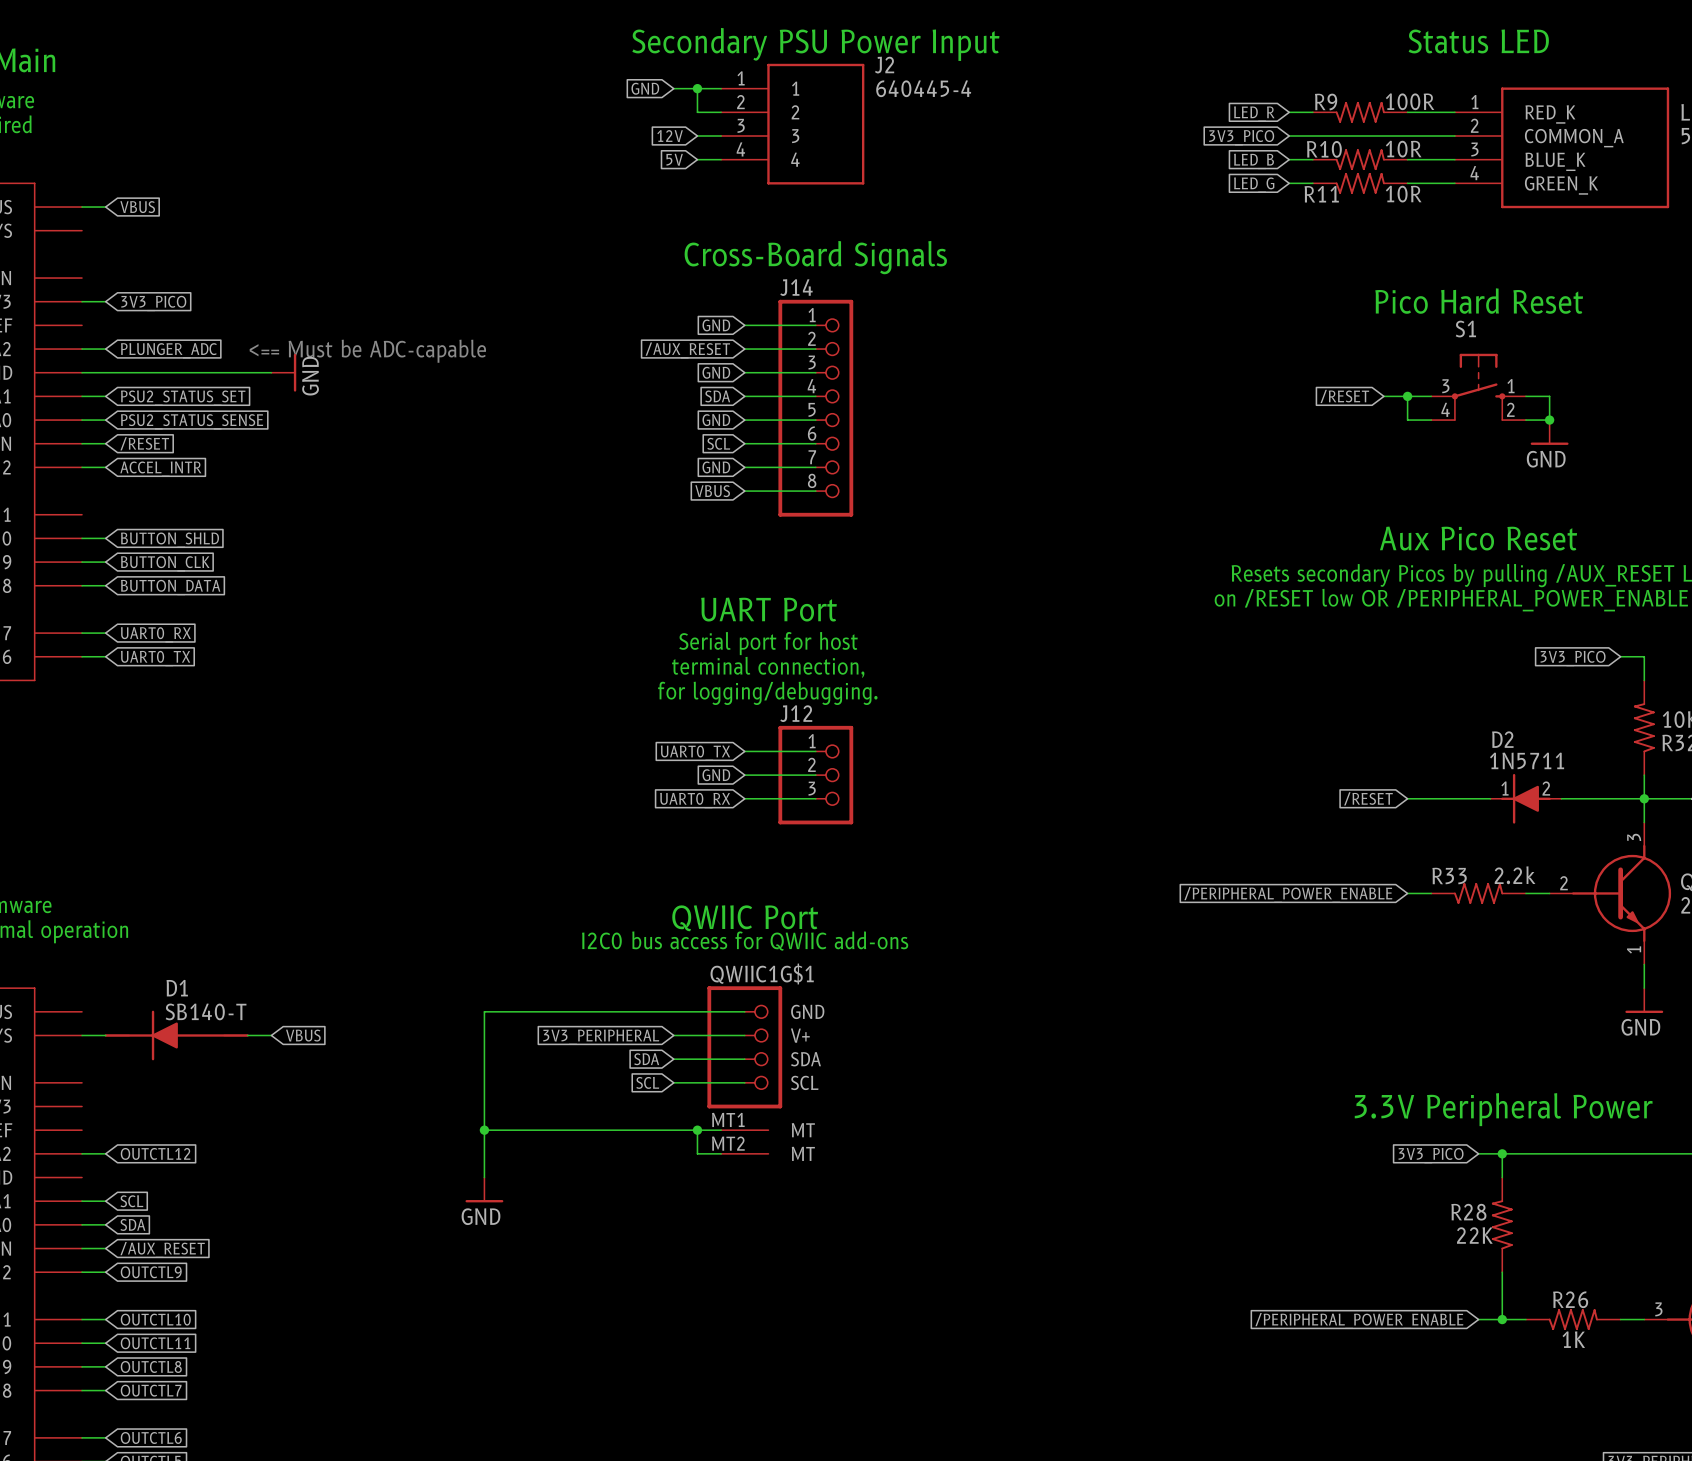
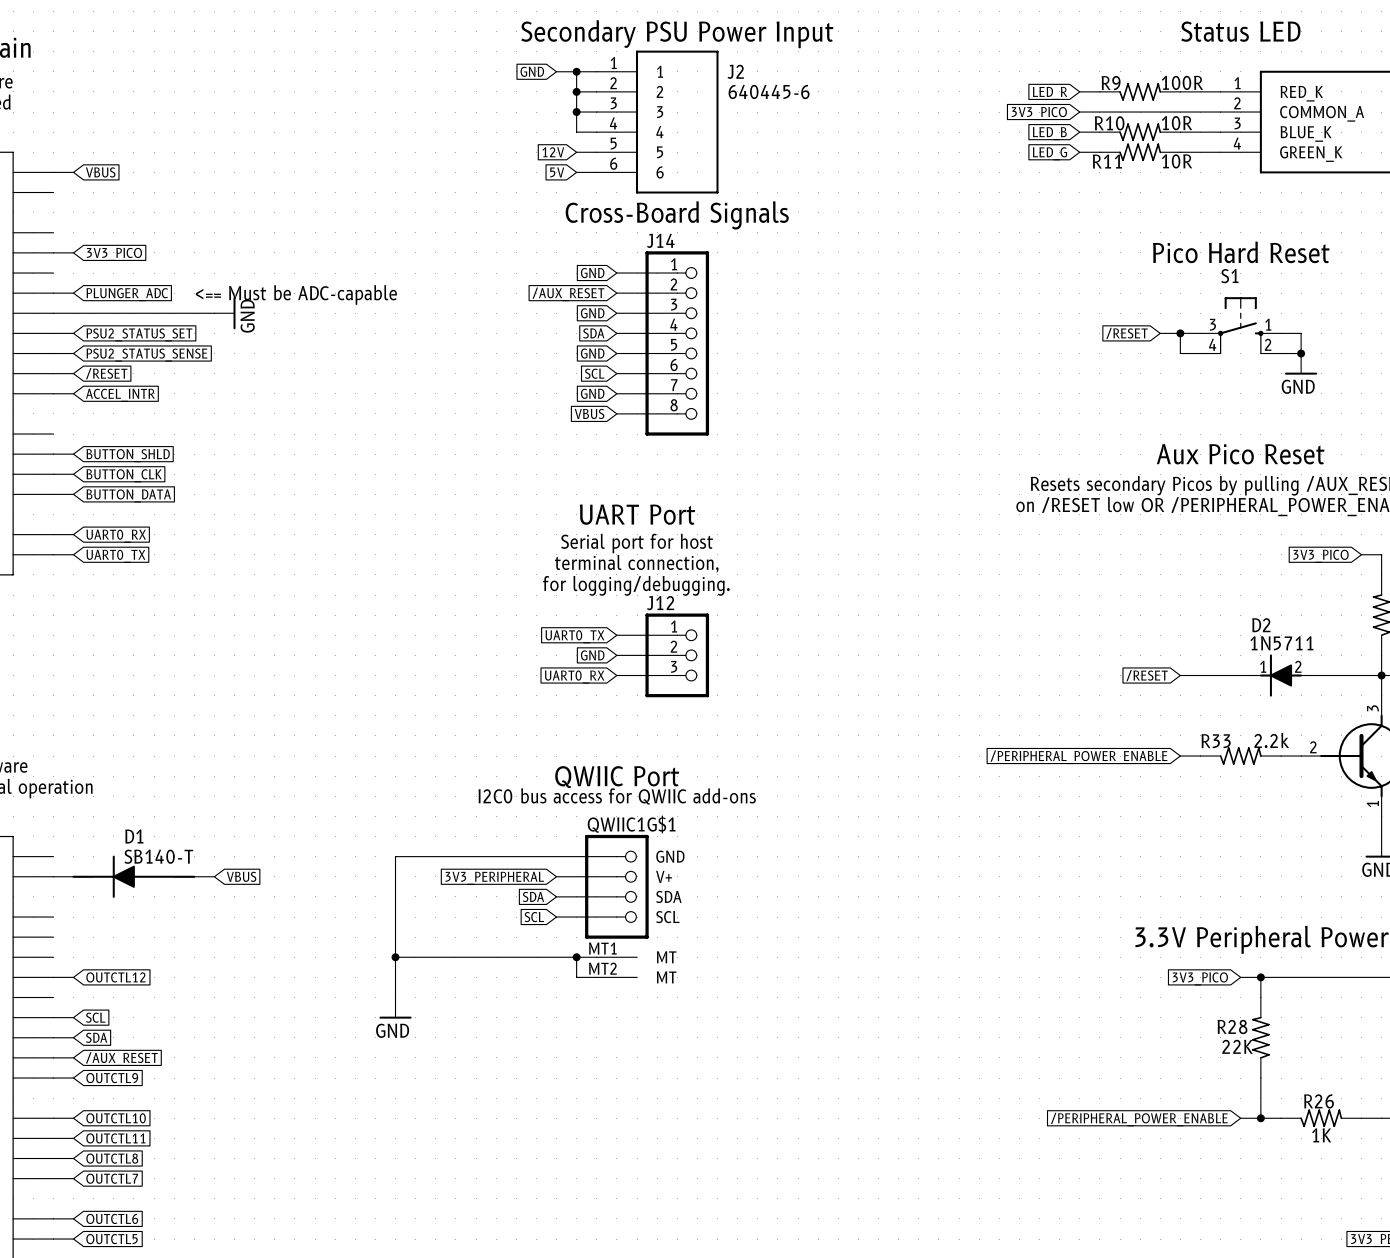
J2 symbol: [721, 63, 865, 185] -> [596, 50, 719, 194]
J2 value: 640445-4 (923, 88) -> 640445-6 (769, 91)
wire: none -> (576, 91) (576, 132)
junction: none -> (576, 91)
global label position: 12V (670, 136) -> 12V (553, 152)
junction: none -> (576, 112)
global label position: 5V (674, 159) -> 5V (557, 172)
wire: none -> (576, 152) (596, 152)
wire: none -> (576, 172) (596, 172)

